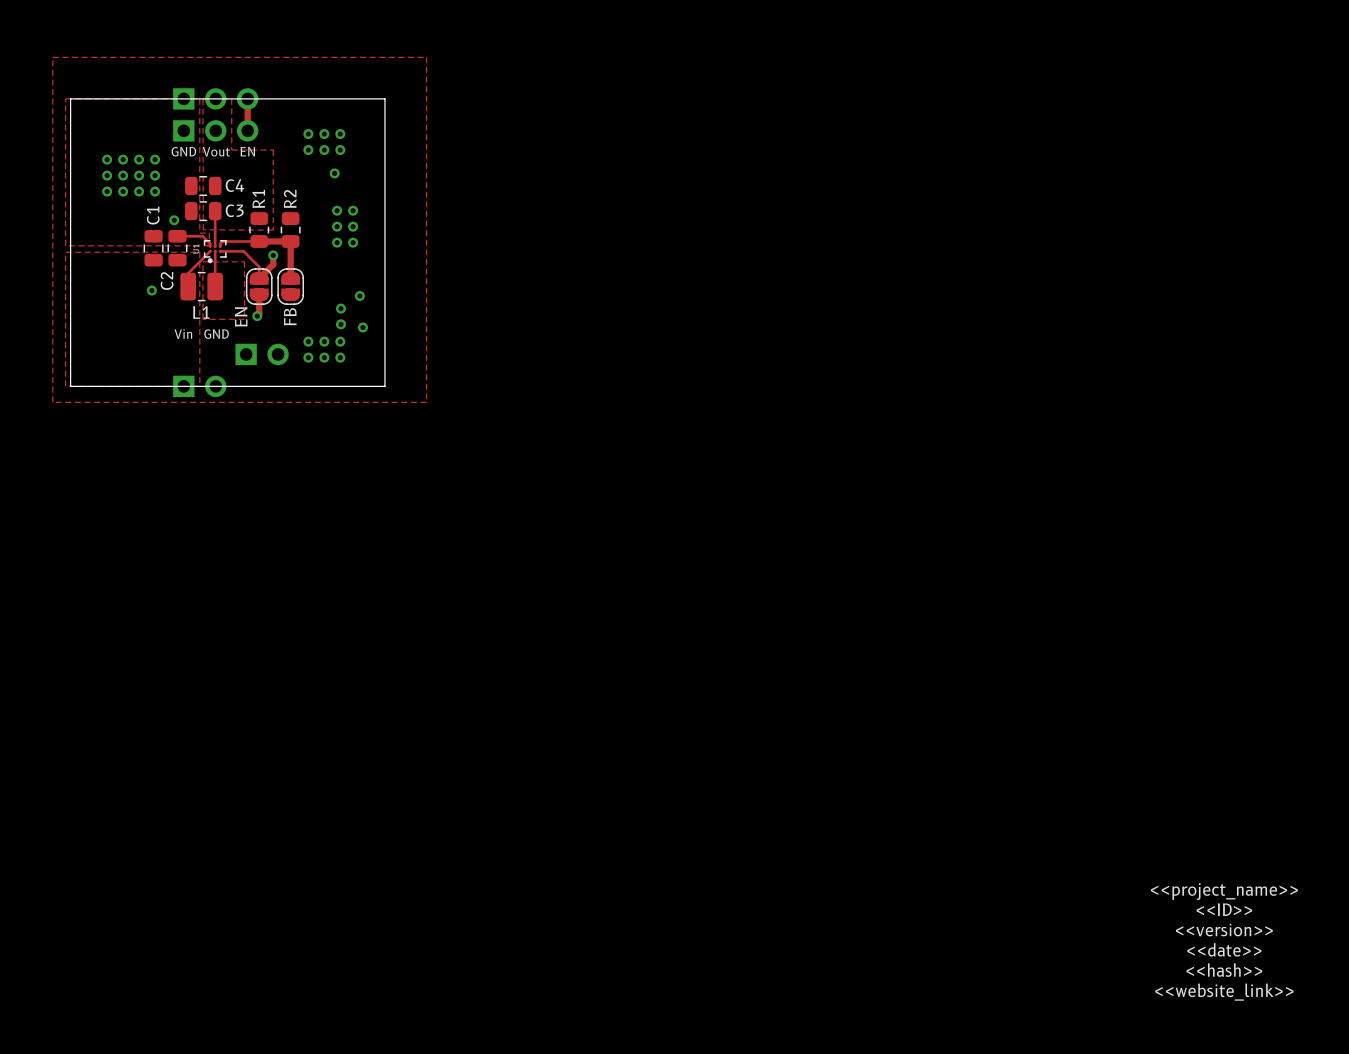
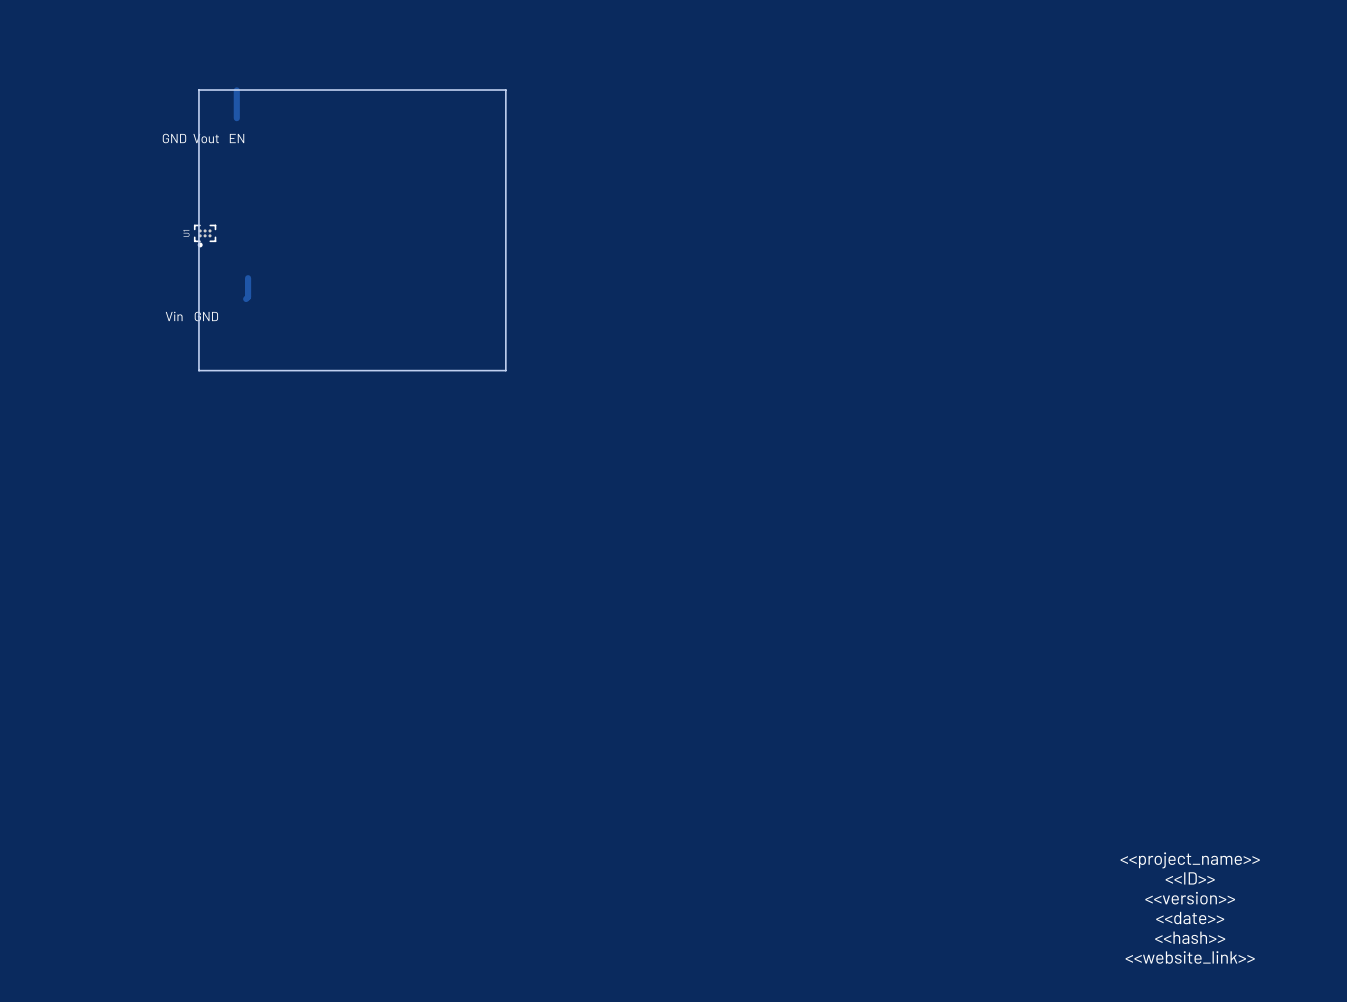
zone outline: (52, 57) (52, 402) (426, 402) (426, 57) (52, 57) -> none
zone outline: (65, 98) (65, 245) (209, 245) (209, 233) (199, 233) (199, 98) (65, 98) -> none
board edge: (70, 98) (384, 98) (384, 386) (70, 386) (70, 98) -> (198, 90) (505, 90) (505, 370) (198, 370) (198, 90)
zone outline: (202, 98) (231, 98) (231, 150) (273, 150) (273, 230) (203, 229) (202, 98) -> none
part: (215, 98) -> none
part: (215, 130) -> none
via: (308, 134) -> none
via: (324, 134) -> none
via: (340, 134) -> none
via: (308, 150) -> none
via: (324, 150) -> none
via: (340, 150) -> none
via: (107, 159) -> none
via: (123, 159) -> none
via: (139, 159) -> none
via: (155, 159) -> none
via: (334, 173) -> none
via: (107, 175) -> none
via: (123, 175) -> none
via: (139, 175) -> none
via: (155, 175) -> none
C4: (203, 186) -> none
via: (107, 191) -> none
via: (123, 191) -> none
via: (139, 191) -> none
via: (155, 191) -> none
via: (337, 210) -> none
via: (353, 210) -> none
C3: (203, 211) -> none
track: (215, 211) (215, 246) -> none
via: (174, 220) -> none
via: (337, 226) -> none
via: (353, 226) -> none
R1: (259, 230) -> none
R2: (290, 230) -> none
track: (177, 236) (202, 236) (210, 243) (210, 246) -> none
via: (337, 242) -> none
via: (353, 242) -> none
track: (220, 246) (222, 241) (290, 241) (290, 278) -> none
C1: (153, 248) -> none
C2: (177, 248) -> none
track: (210, 251) (188, 273) (188, 286) -> none
track: (215, 251) (215, 286) -> none
track: (220, 251) (243, 251) (259, 266) (259, 278) -> none
zone outline: (65, 252) (65, 386) (199, 386) (199, 252) (65, 252) -> none
track: (273, 255) (273, 264) (259, 278) -> none
via: (273, 255) -> none
zone outline: (202, 261) (202, 319) (244, 319) (244, 261) (202, 261) -> none
L1: (201, 286) -> none
part: (259, 286) -> none
part: (290, 286) -> none
via: (151, 290) -> none
via: (359, 296) -> none
via: (340, 308) -> none
via: (257, 316) -> none
via: (340, 324) -> none
via: (362, 327) -> none
via: (308, 341) -> none
via: (324, 341) -> none
via: (340, 341) -> none
part: (262, 354) -> none
via: (308, 357) -> none
via: (324, 357) -> none
via: (340, 357) -> none
part: (199, 386) -> none

